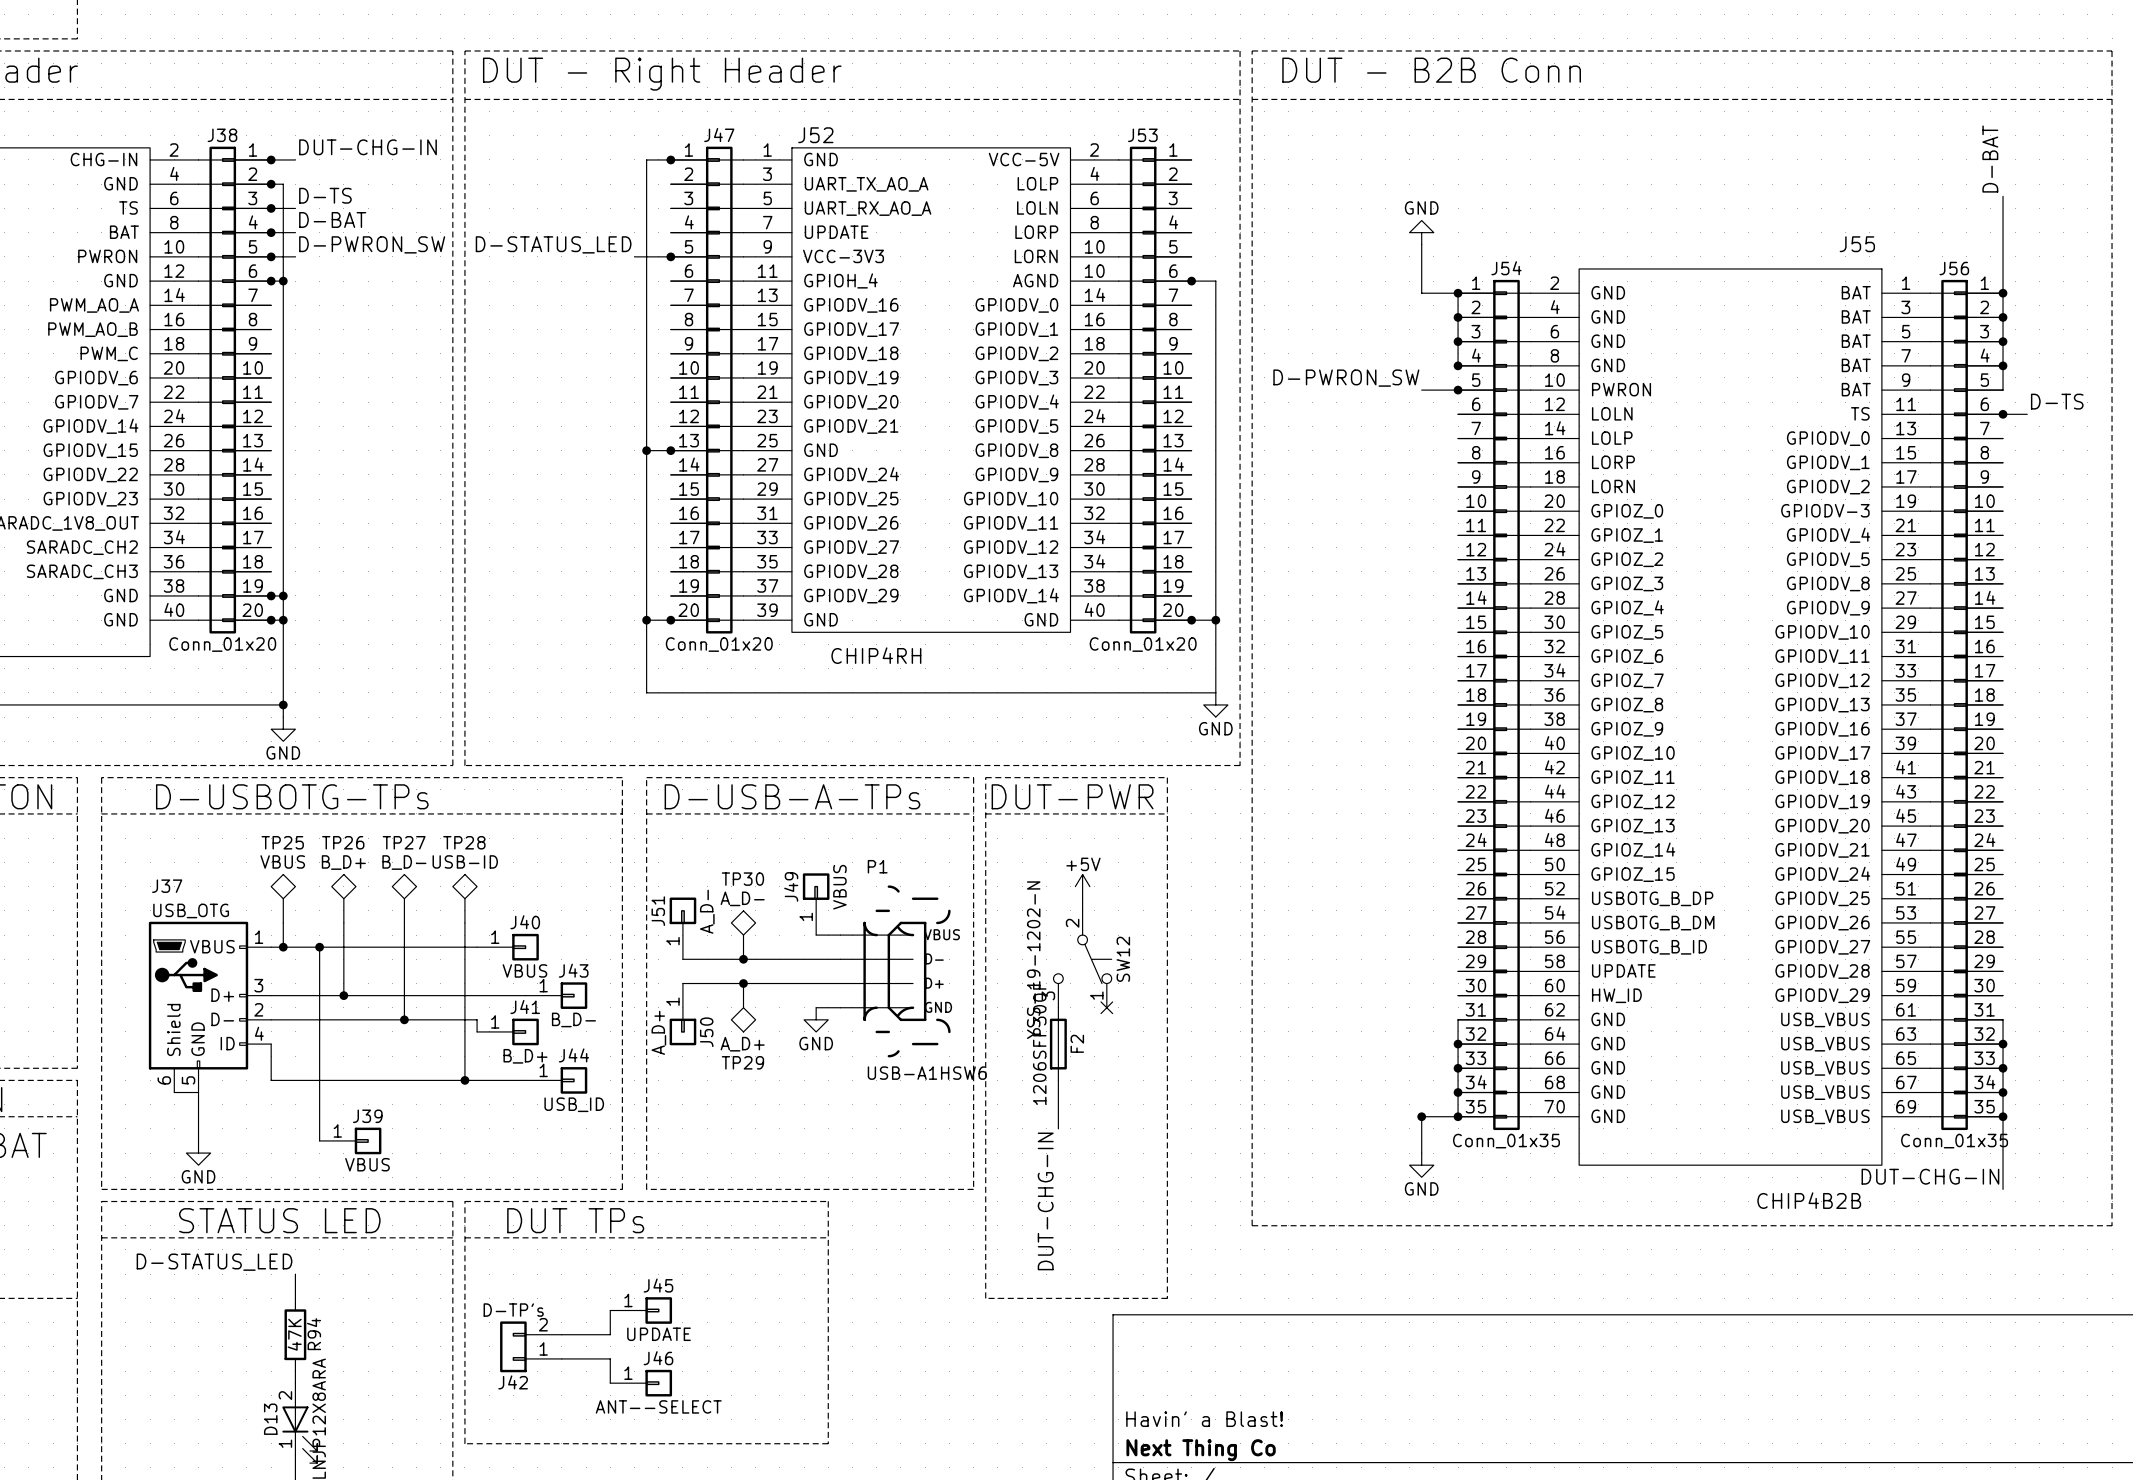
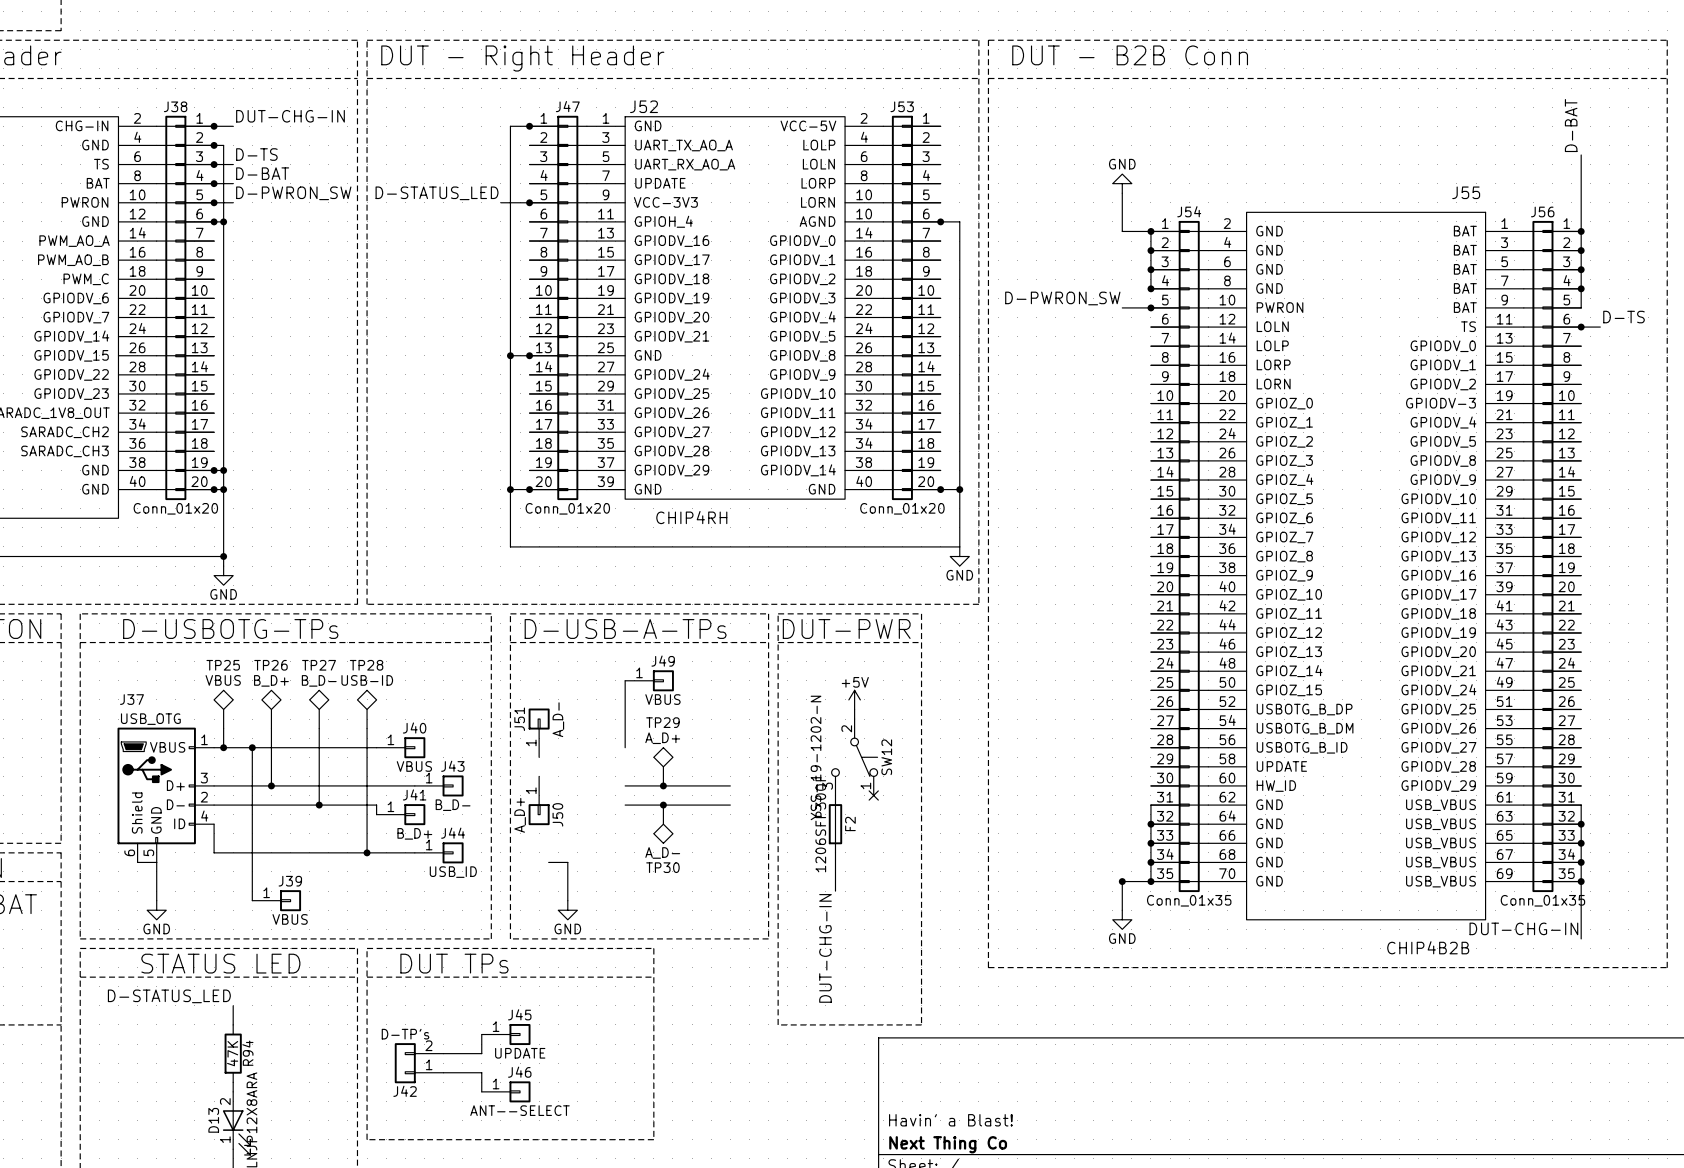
wire: none -> (625, 680) (625, 747)
J49 rotation: 0° (816, 886) -> 90° clockwise (663, 680)
J49 position: (816, 904) -> (649, 680)
TP30 rotation: 0° (743, 922) -> 180° (663, 833)
TP30 position: (743, 935) -> (663, 824)
wire: (816, 935) (840, 935) -> none
wire: (682, 959) (840, 959) -> none
junction: (743, 959) -> none
P1: USB-A1HSW6 (895, 971) -> none
wire: (682, 983) (840, 983) -> none
junction: (743, 983) -> none
wire: none -> (625, 785) (730, 785)
junction: none -> (663, 785)
TP29 position: (743, 1007) -> (663, 766)
wire: (816, 1007) (840, 1007) -> none
TP29 rotation: 0° (743, 1019) -> 180° (663, 757)
wire: none -> (625, 805) (730, 805)
power symbol position: GND (816, 1019) -> GND (567, 910)
junction: none -> (663, 805)
wire: none -> (548, 862) (567, 862) (567, 900)

